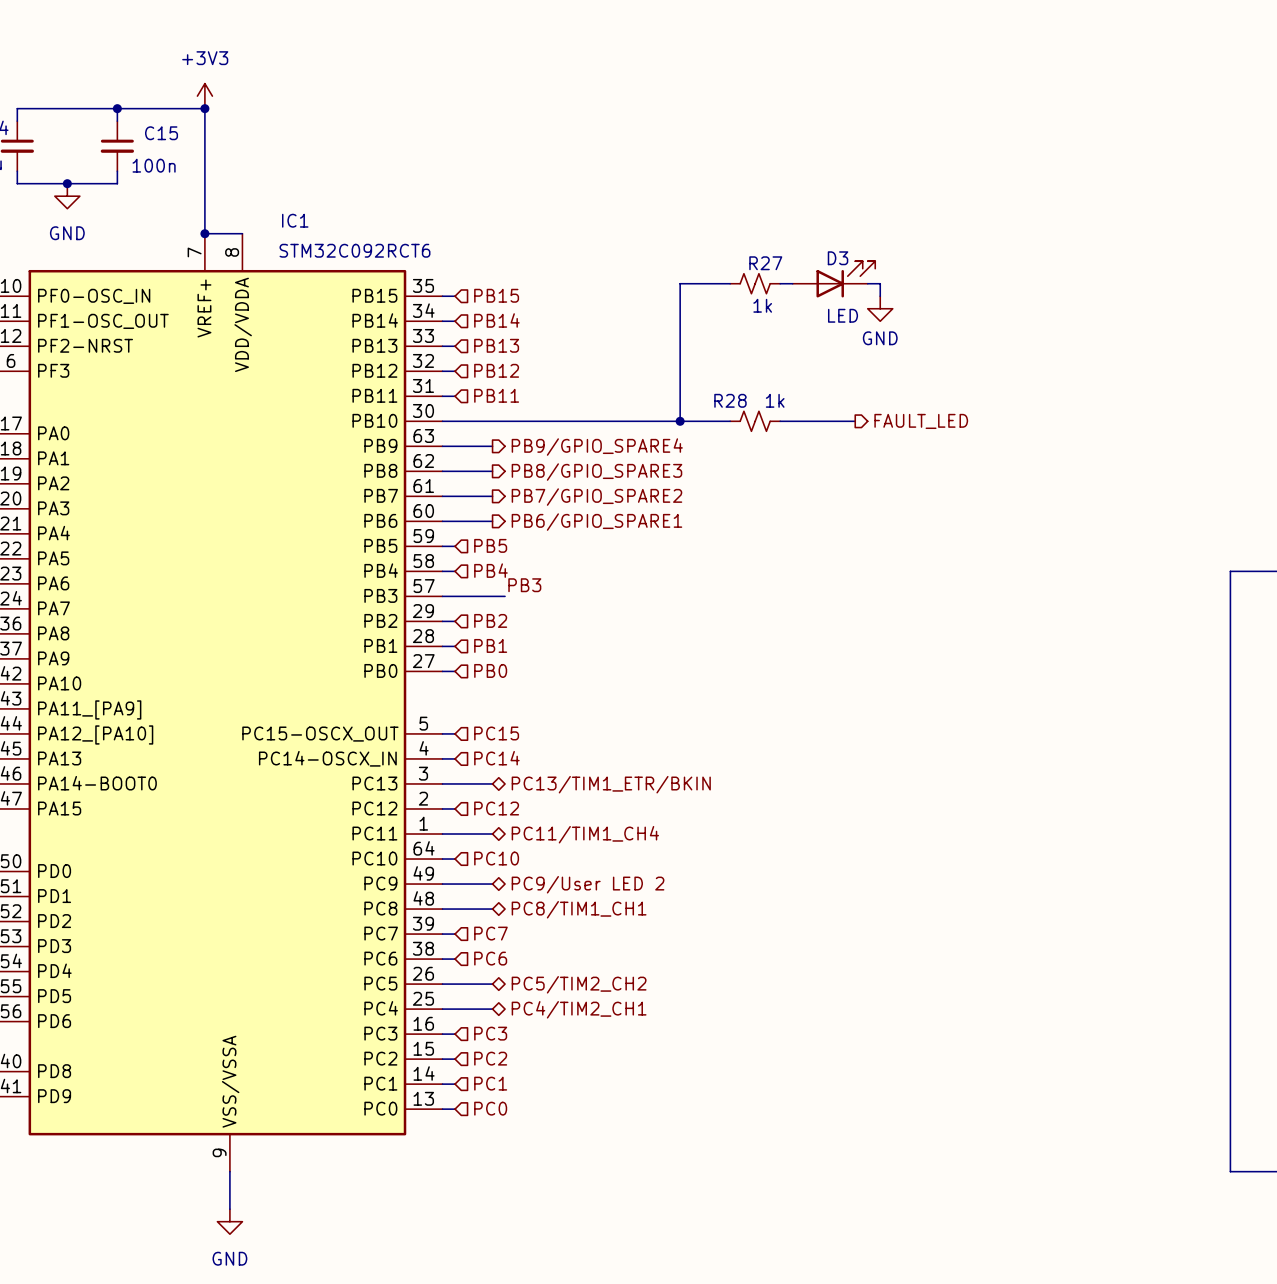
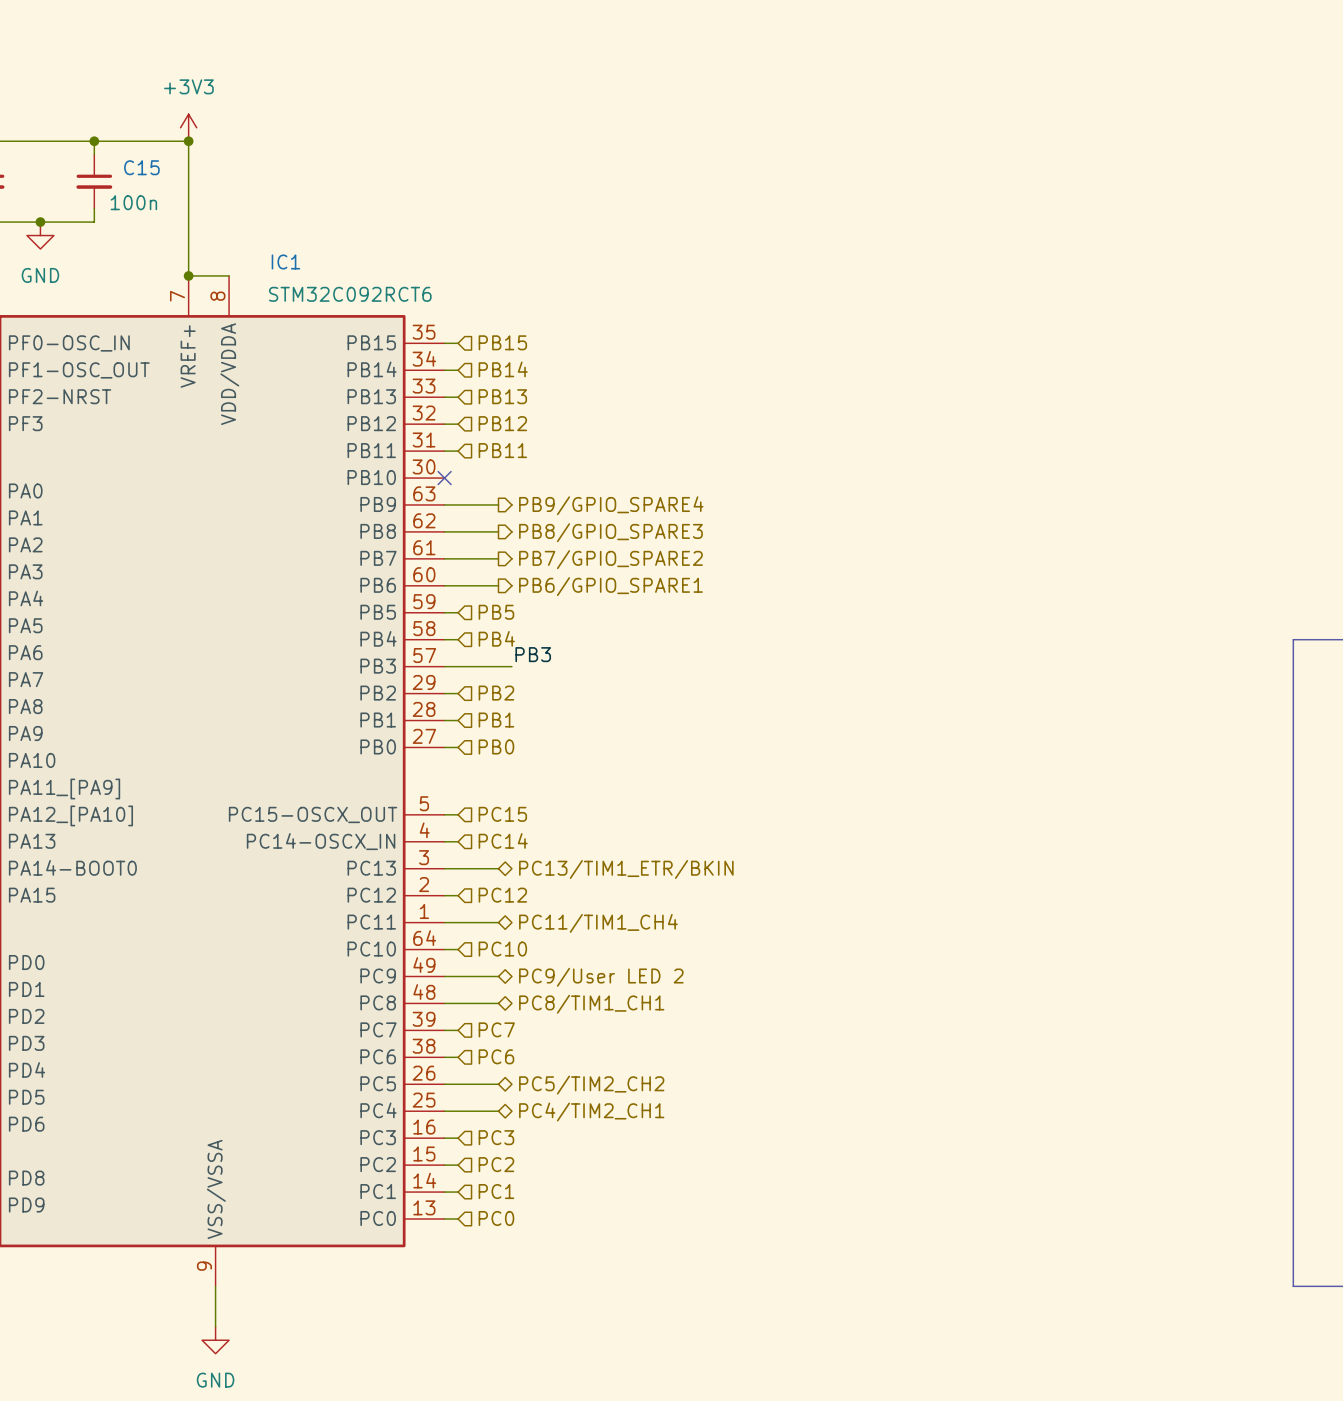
D3: LED (833, 279) -> none
wire: (730, 283) (680, 283) (680, 421) -> none
R27: 1k (755, 283) -> none
wire: (780, 283) (792, 283) -> none
wire: (867, 283) (880, 283) (880, 296) -> none
power symbol: GND (880, 308) -> none
wire: (442, 421) (730, 421) -> none
no-connect mark: none -> (444, 478)
junction: (680, 421) -> none
R28: 1k (755, 421) -> none
wire: (780, 421) (855, 421) -> none
hierarchical label: FAULT_LED (921, 421) -> none

